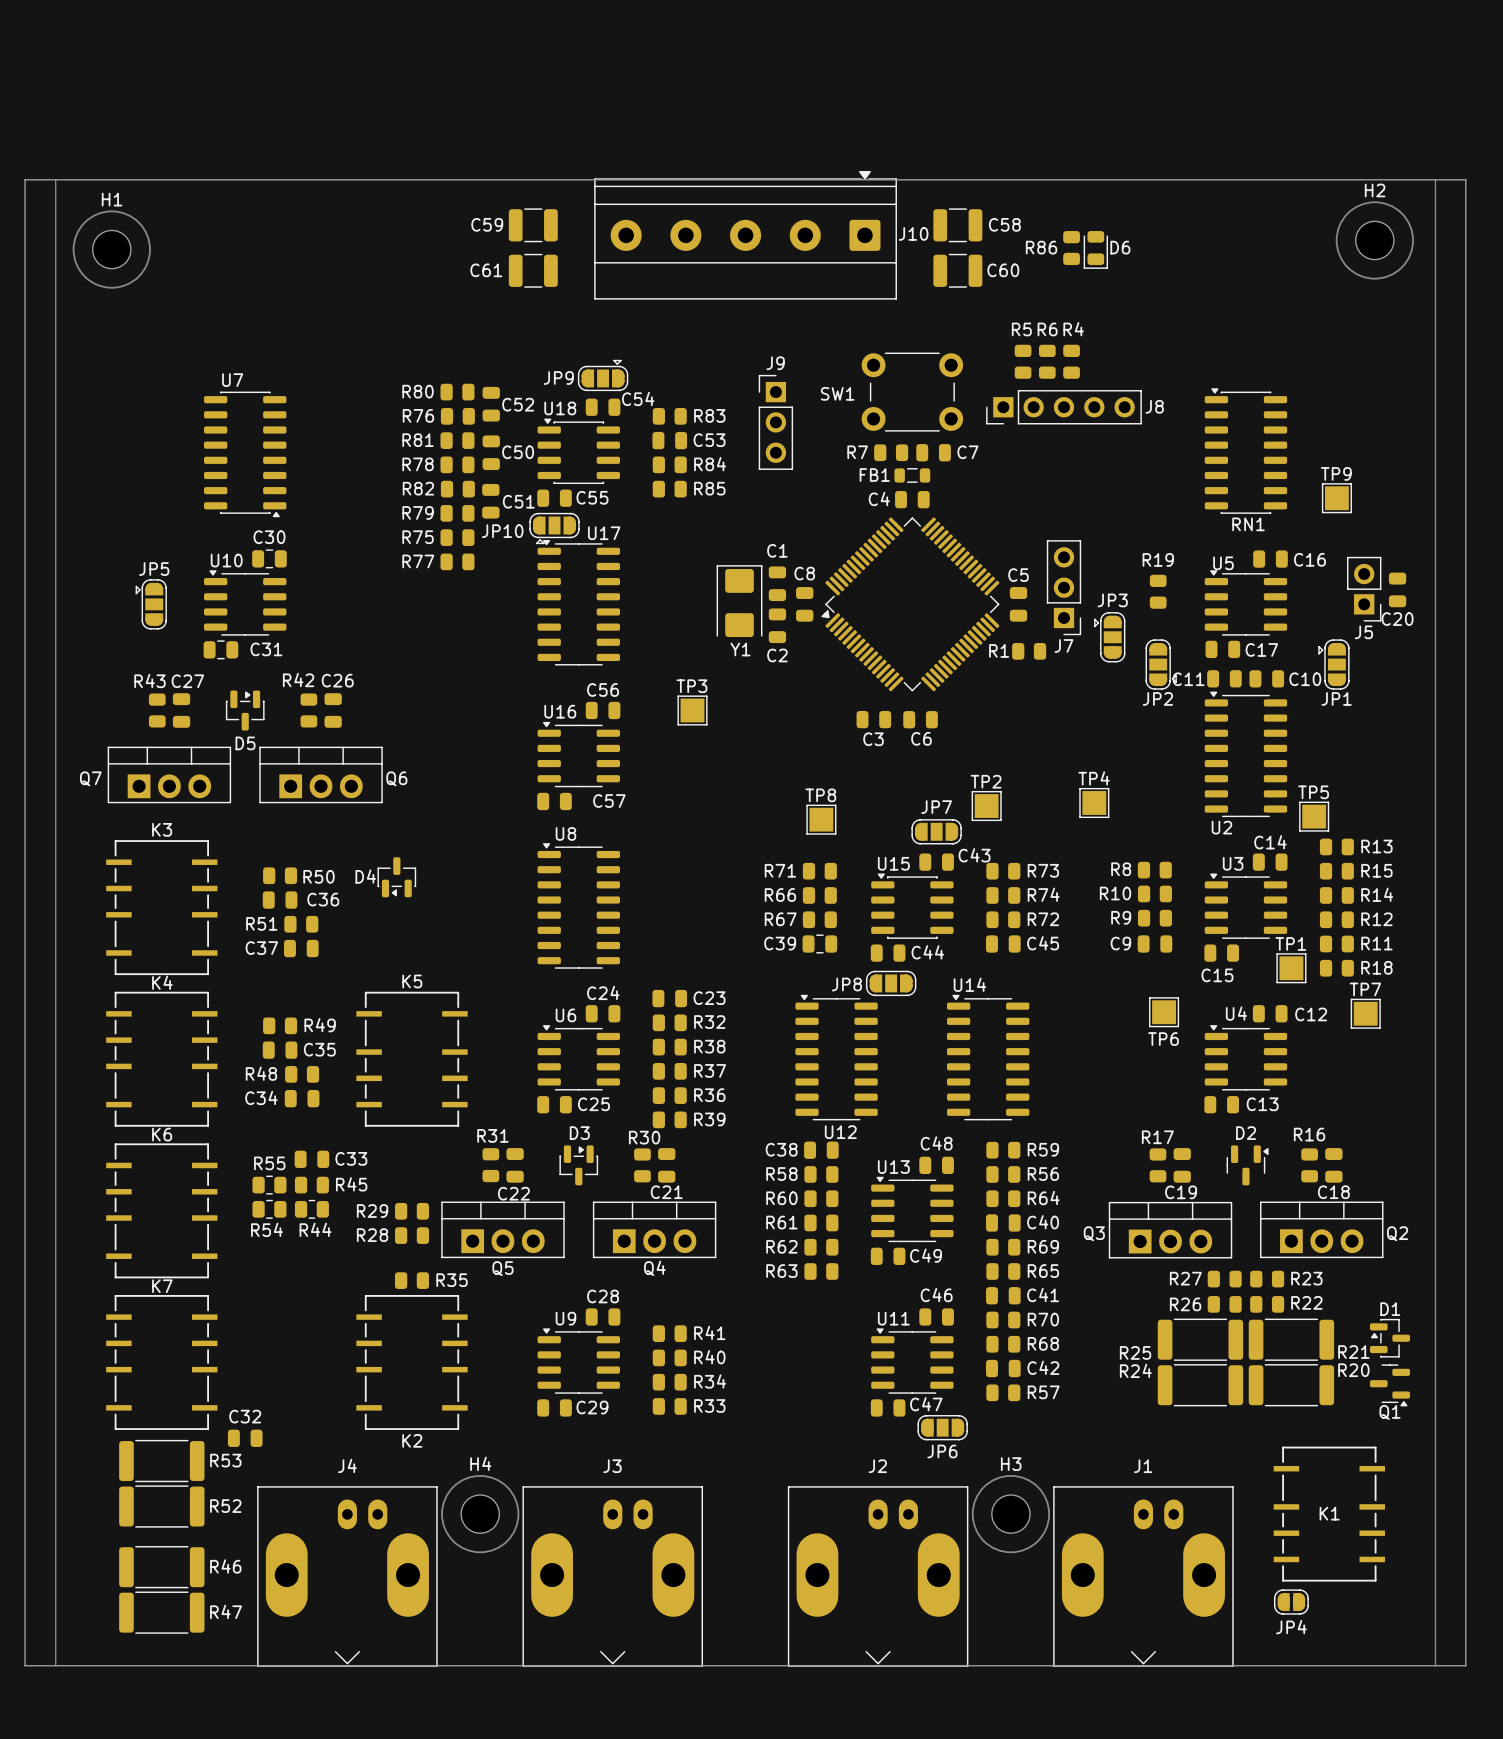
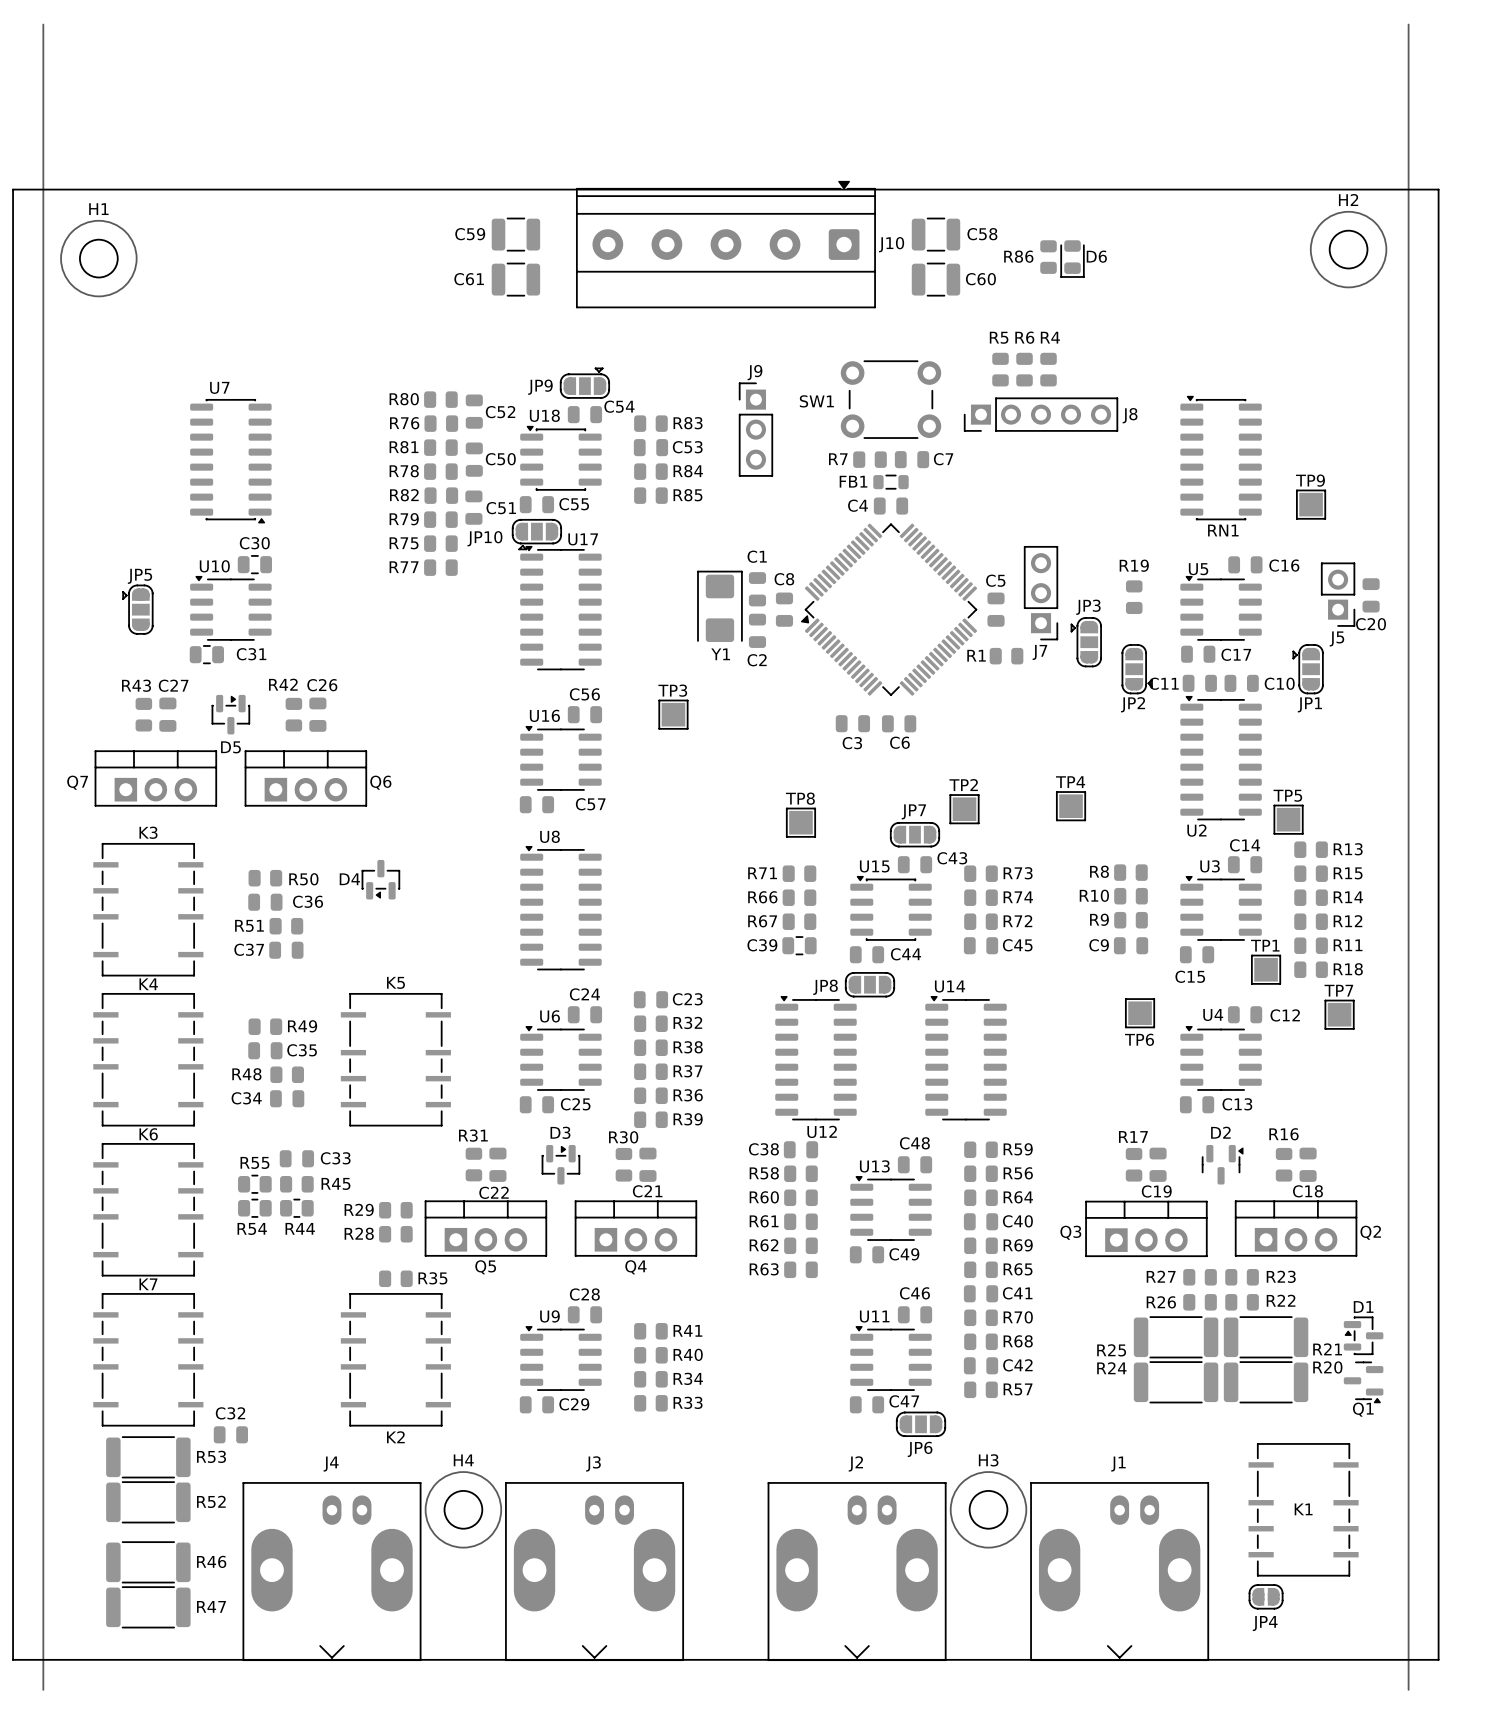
line: none -> (43, 24) (43, 189)
line: none -> (1408, 24) (1408, 189)
line: none -> (43, 1659) (43, 1689)
line: none -> (1408, 1659) (1408, 1689)

